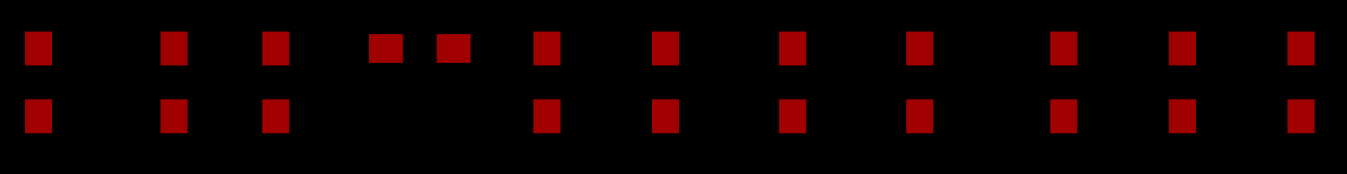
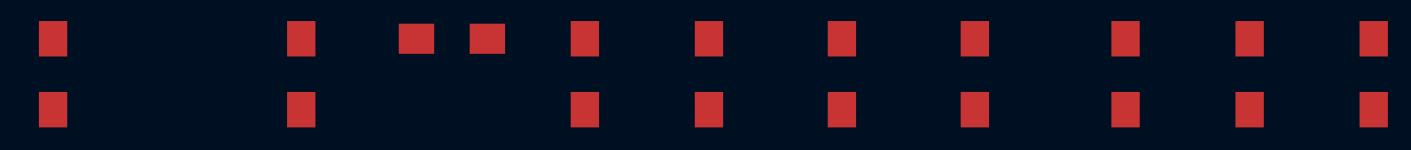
part: (174, 82) -> none

